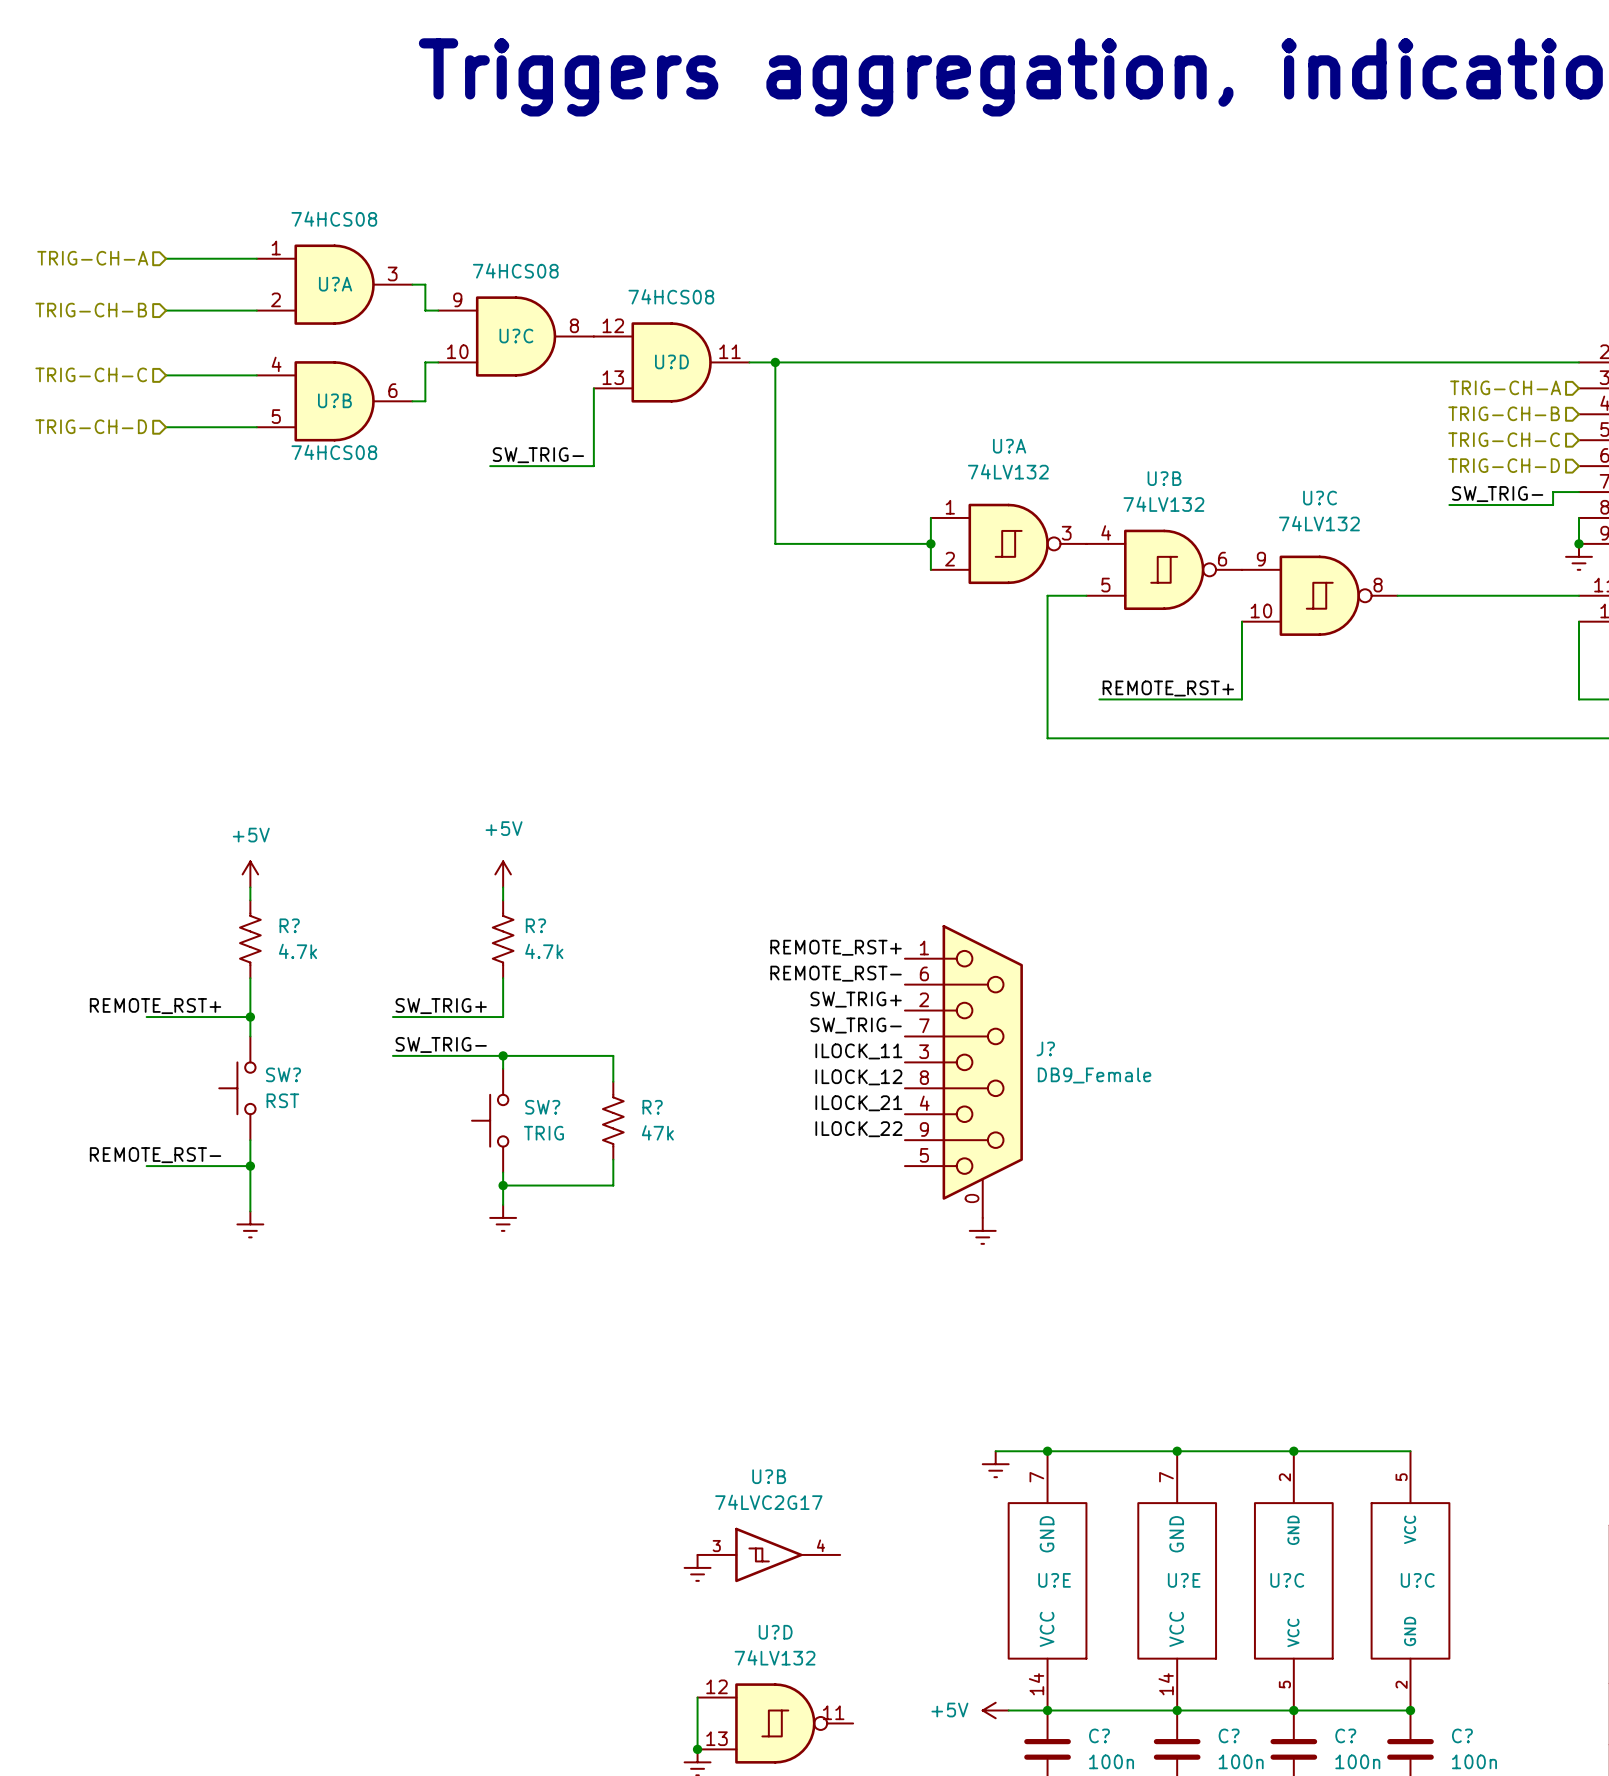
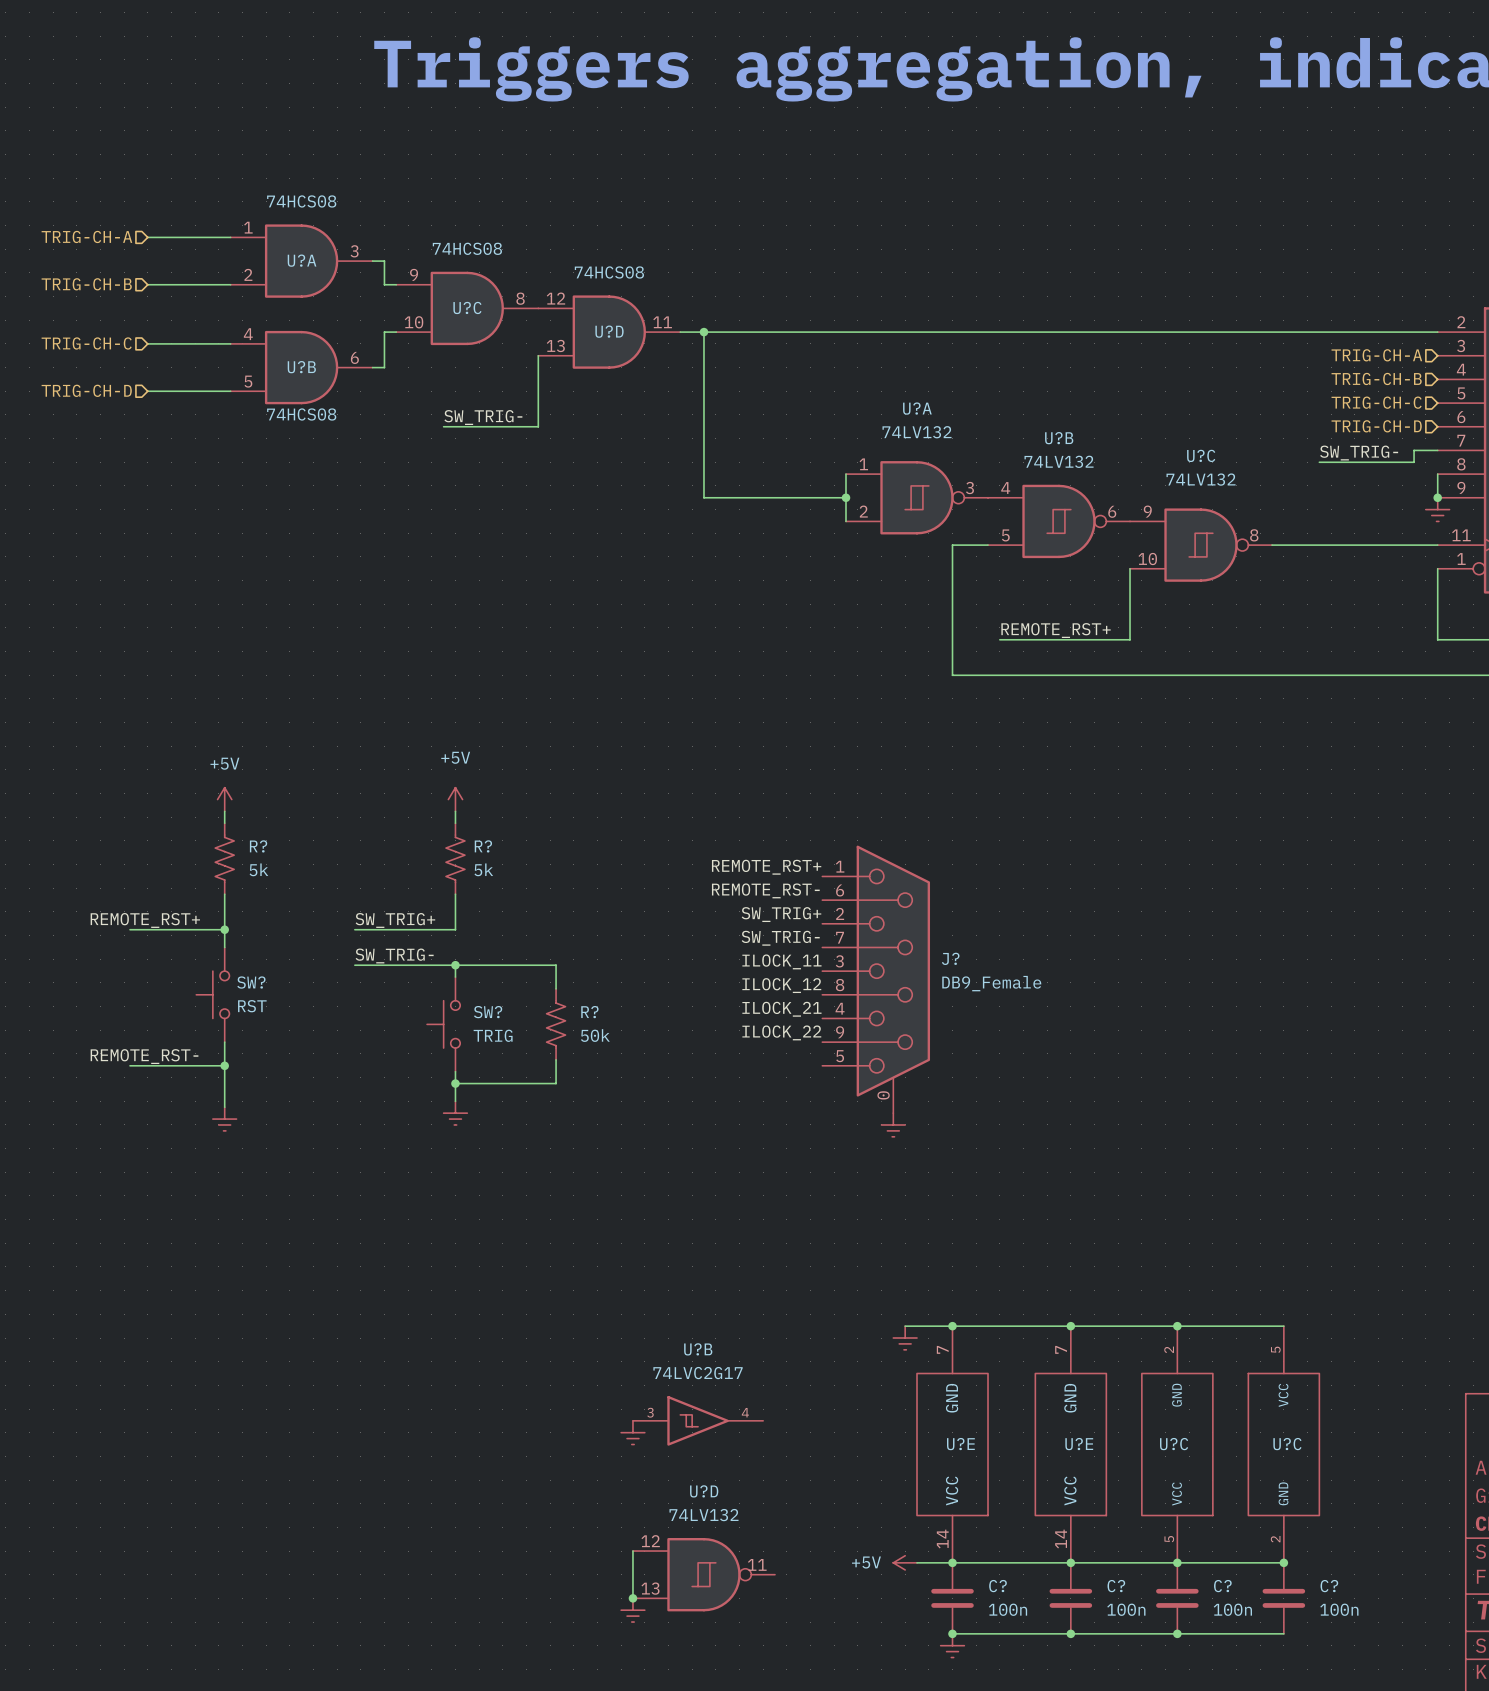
R? value: 4.7k (297, 951) -> 5k (258, 869)
R? value: 4.7k (544, 951) -> 5k (483, 869)
R? value: 47k (657, 1132) -> 50k (595, 1035)

